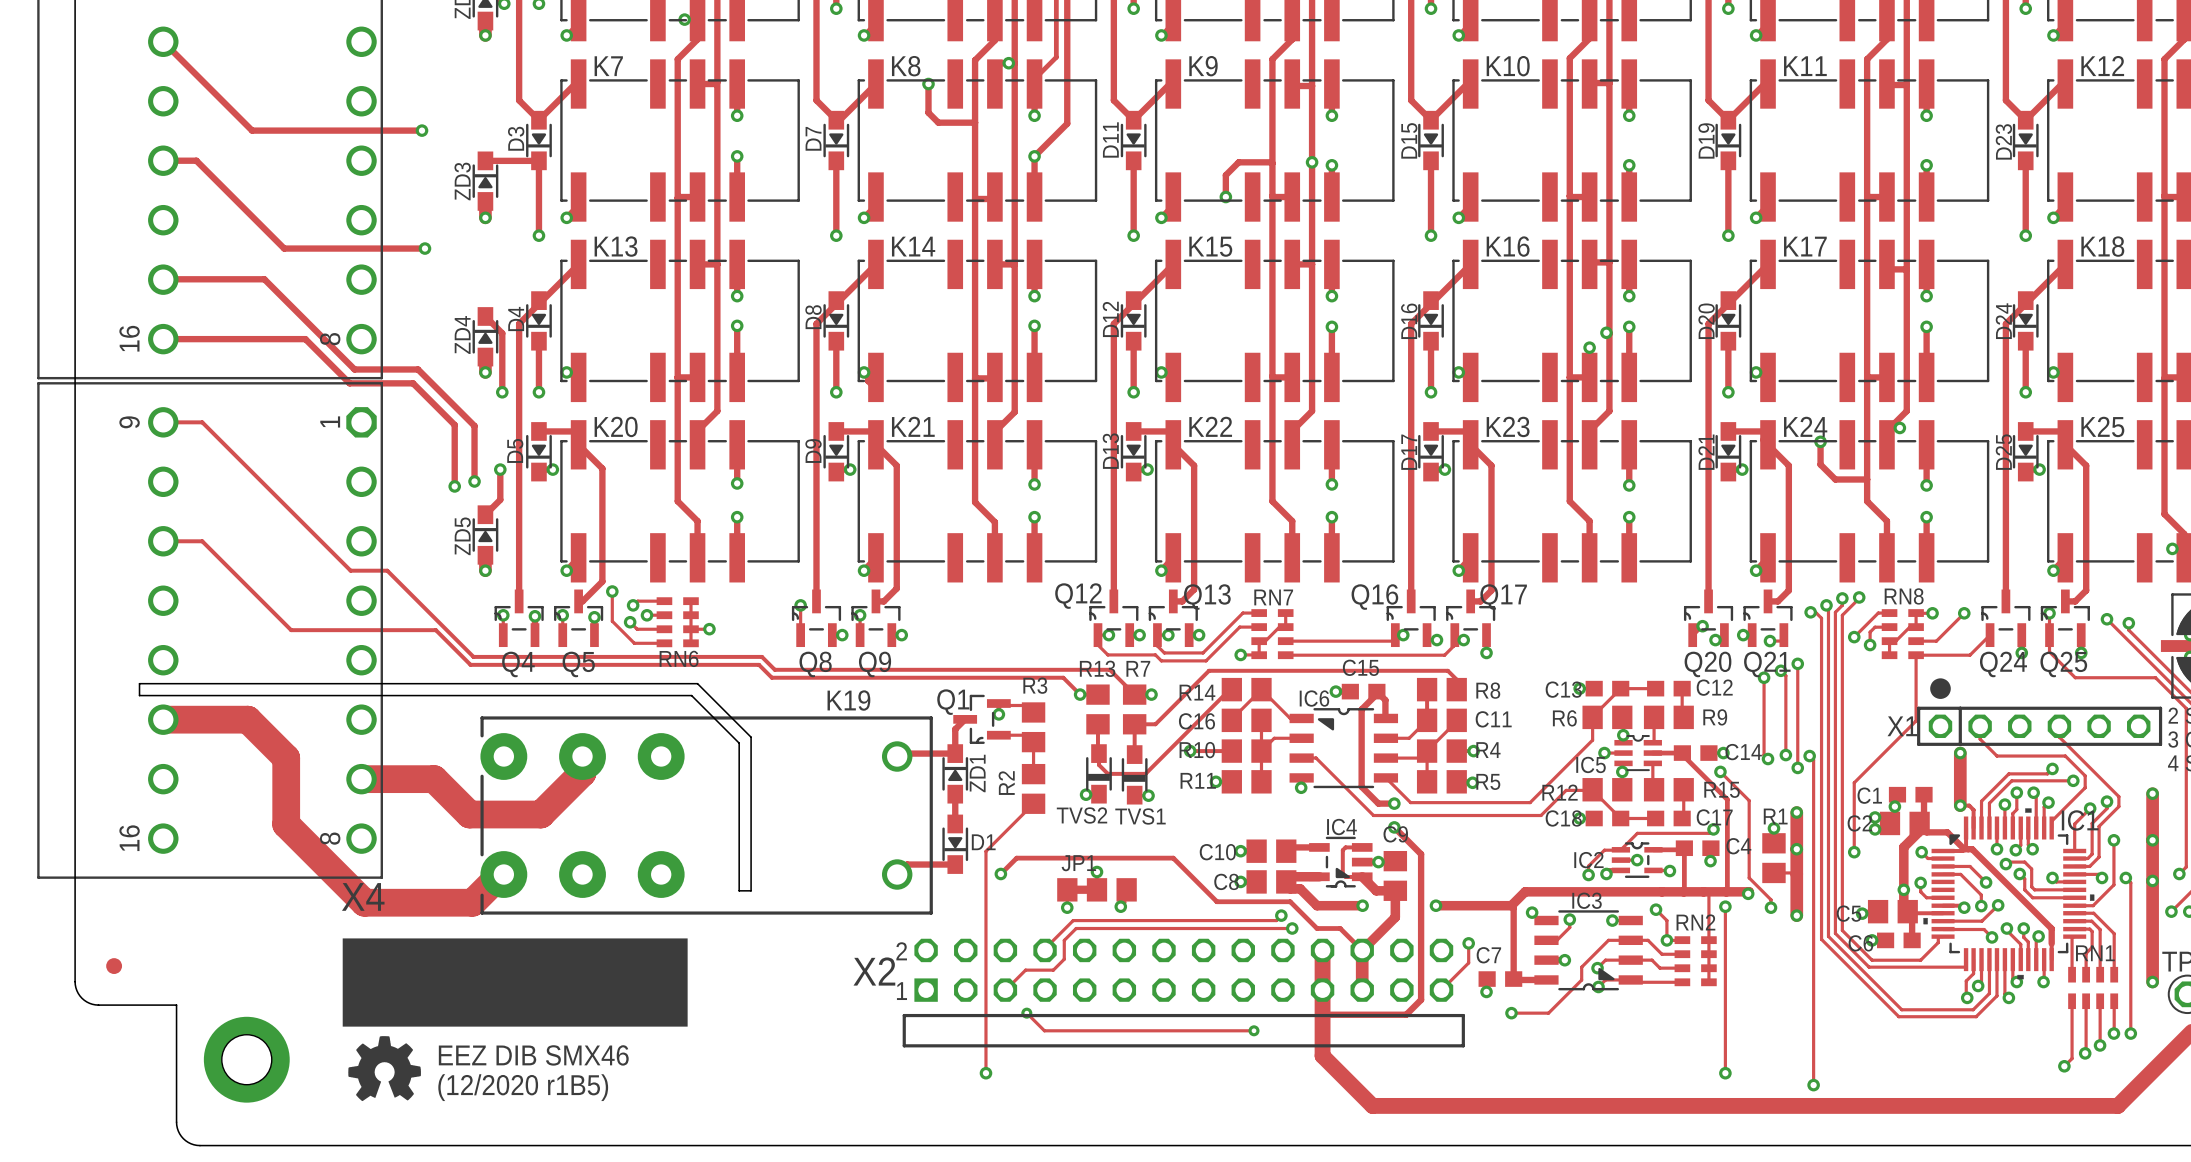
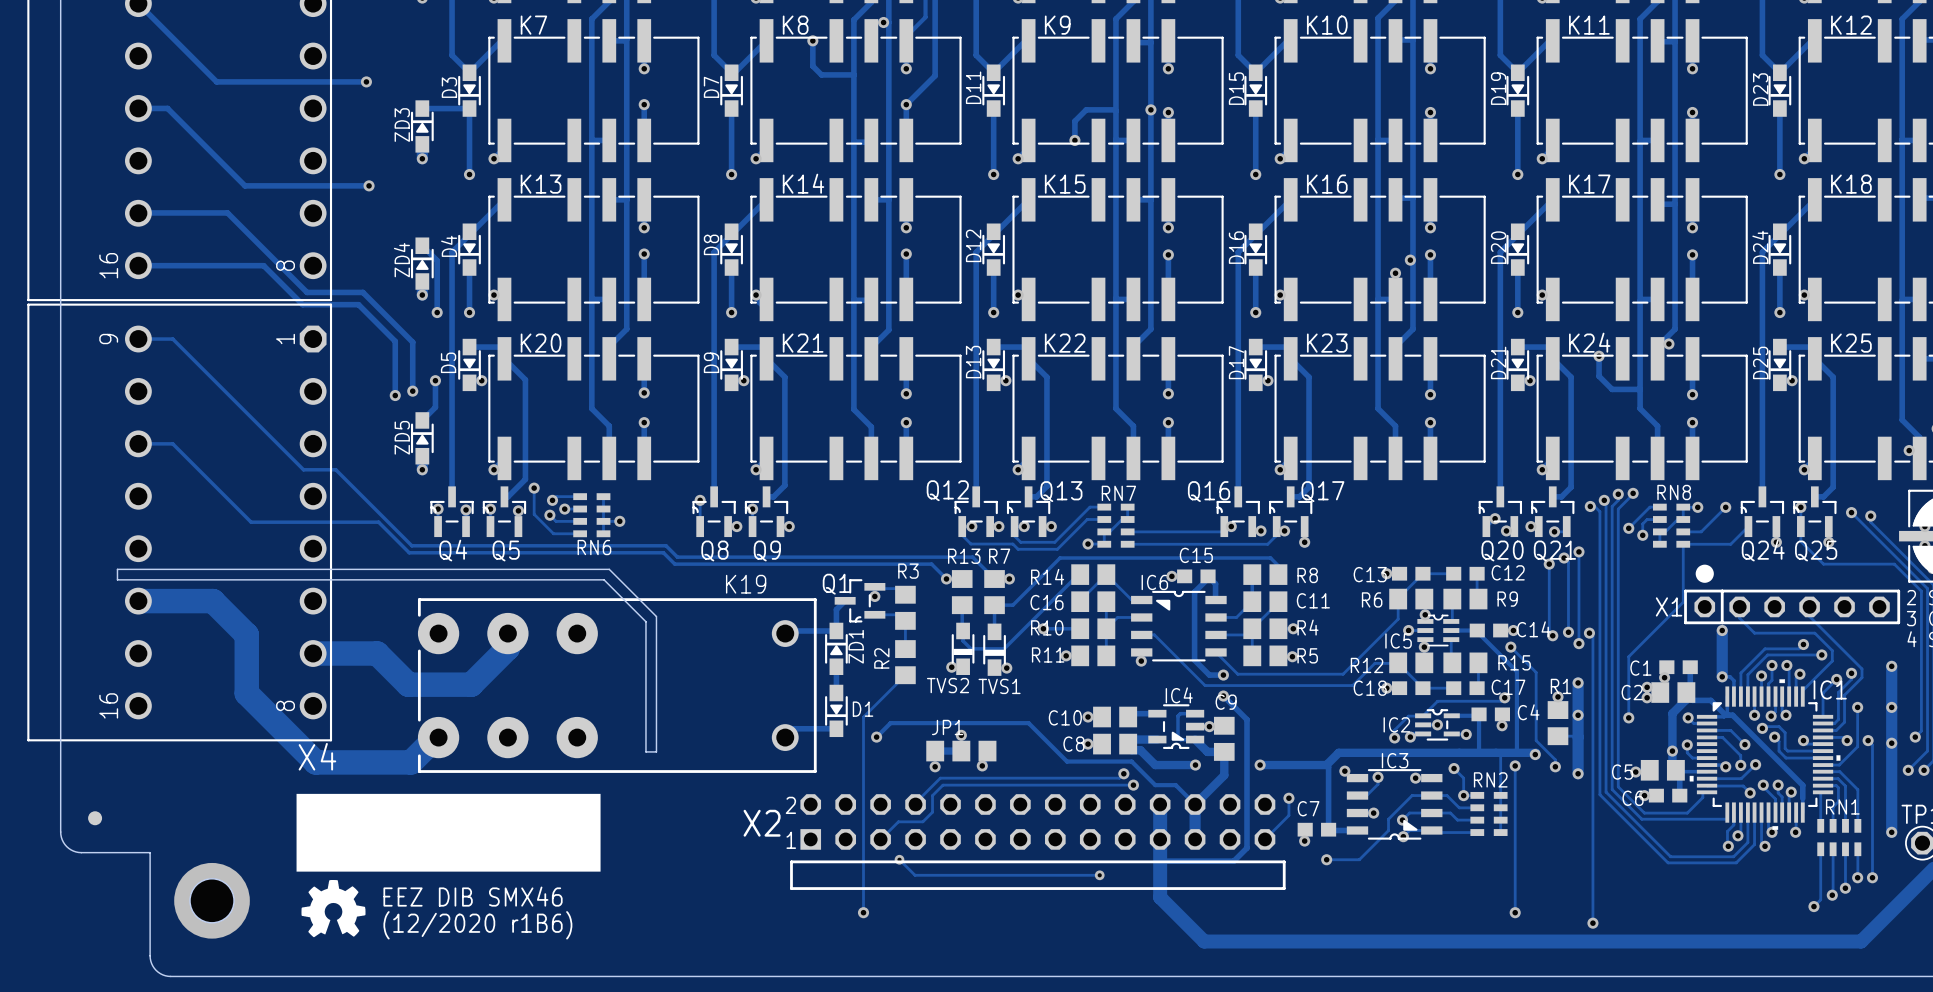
text: (12/2020 r1B5) (523, 1087) -> (12/2020 r1B6) (477, 925)

